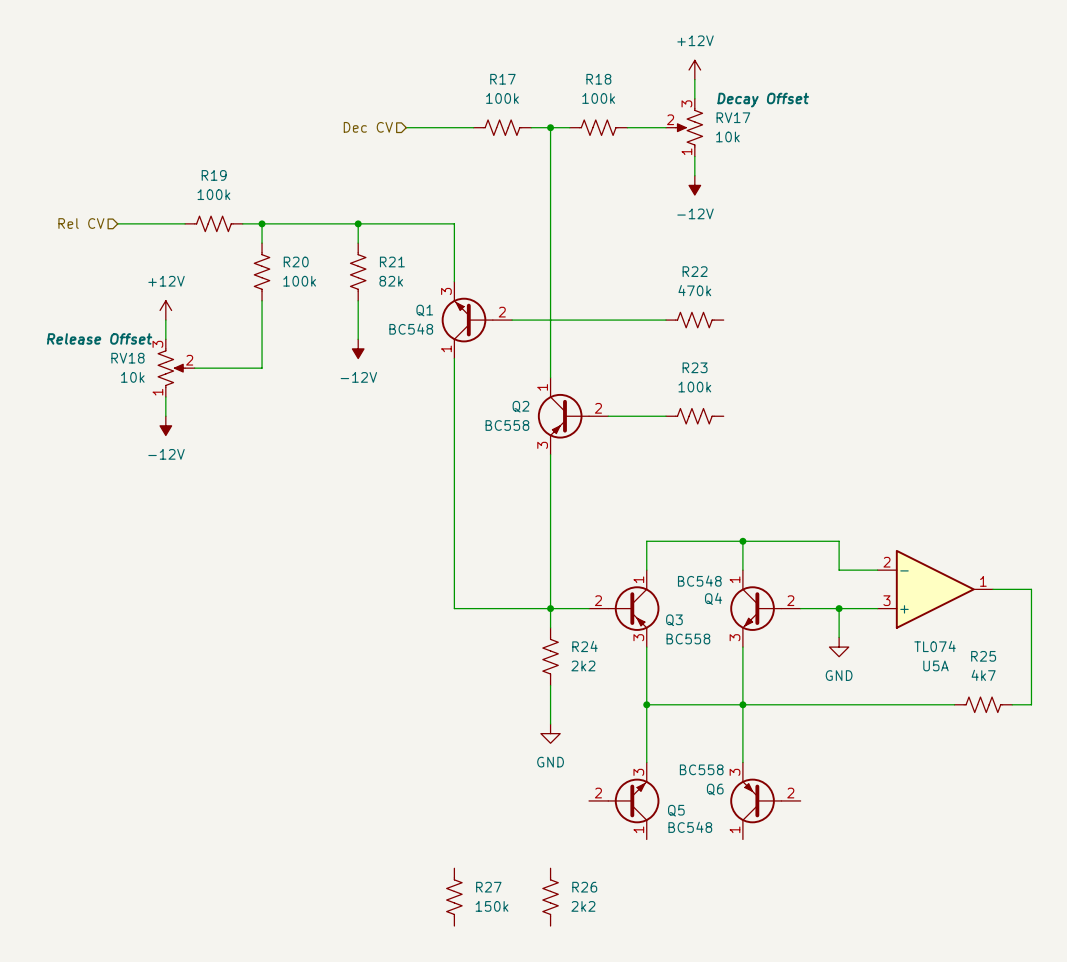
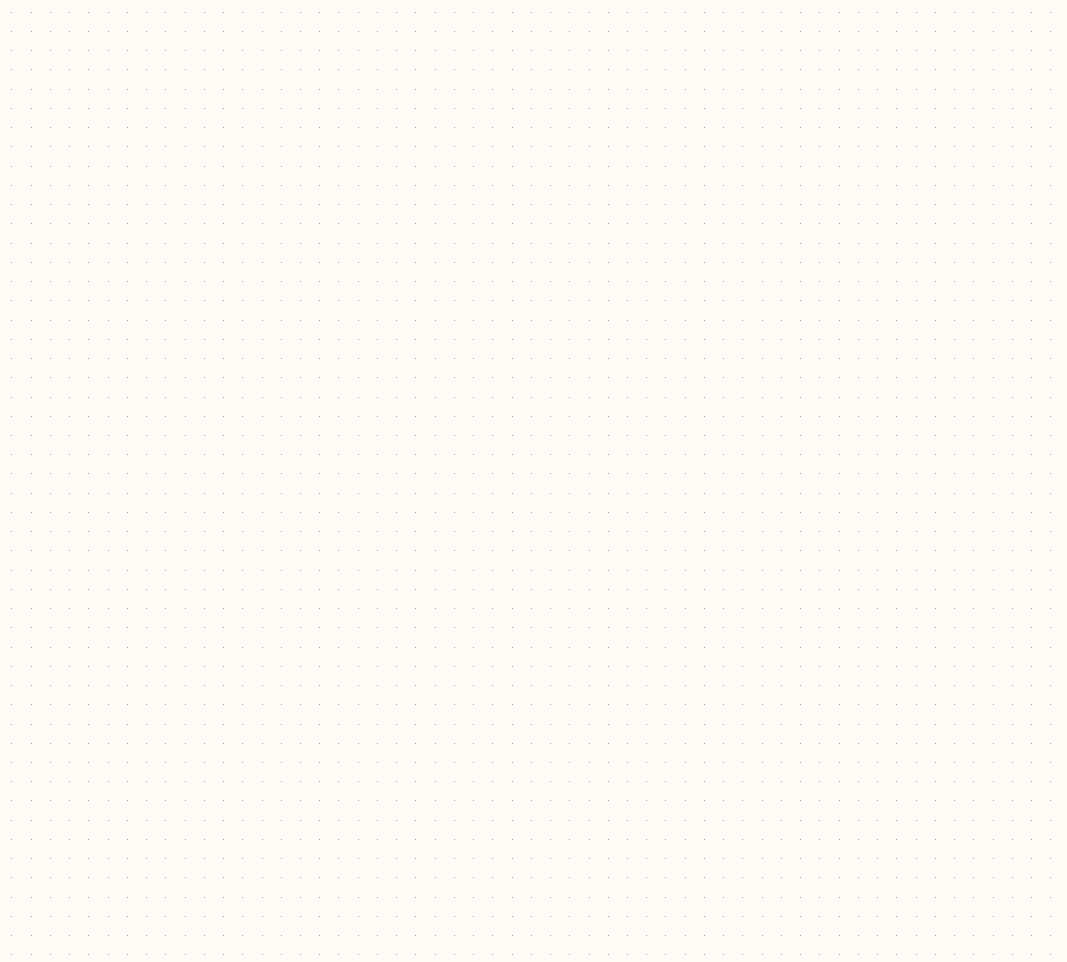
power symbol: +12V (694, 69) -> none
wire: (694, 79) (694, 98) -> none
hierarchical label: Dec CV (368, 127) -> none
wire: (406, 127) (473, 127) -> none
R17: 100k (502, 127) -> none
wire: (531, 127) (569, 127) -> none
wire: (550, 127) (550, 377) -> none
junction: (550, 127) -> none
R18: 100k (598, 127) -> none
wire: (627, 127) (665, 127) -> none
RV17: 10k (684, 127) -> none
wire: (694, 156) (694, 175) -> none
power symbol: -12V (694, 185) -> none
hierarchical label: Rel CV (81, 223) -> none
wire: (117, 223) (185, 223) -> none
R19: 100k (213, 223) -> none
wire: (242, 223) (454, 223) (454, 281) -> none
wire: (262, 223) (262, 243) -> none
junction: (262, 223) -> none
wire: (358, 223) (358, 243) -> none
junction: (358, 223) -> none
R20: 100k (262, 271) -> none
R21: 82k (358, 271) -> none
wire: (262, 300) (262, 368) (194, 368) -> none
wire: (358, 300) (358, 339) -> none
power symbol: +12V (165, 310) -> none
wire: (165, 320) (165, 339) -> none
Q1: BC548 (476, 320) -> none
wire: (512, 320) (665, 320) -> none
R22: 470k (694, 320) -> none
power symbol: -12V (358, 348) -> none
wire: (454, 358) (454, 608) (589, 608) -> none
RV18: 10k (176, 368) -> none
wire: (165, 397) (165, 416) -> none
Q2: BC558 (573, 416) -> none
wire: (608, 416) (665, 416) -> none
R23: 100k (694, 416) -> none
power symbol: -12V (165, 425) -> none
wire: (550, 454) (550, 627) -> none
wire: (742, 541) (742, 570) -> none
junction: (742, 541) -> none
wire: (646, 570) (646, 541) (839, 541) (839, 570) (877, 570) -> none
U5A: TL074 (935, 589) -> none
wire: (993, 589) (1031, 589) (1031, 704) (1012, 704) -> none
junction: (550, 608) -> none
Q3: BC558 (624, 608) -> none
Q4: BC548 (765, 608) -> none
wire: (800, 608) (877, 608) -> none
wire: (839, 608) (839, 637) -> none
junction: (839, 608) -> none
wire: (646, 647) (646, 762) -> none
wire: (742, 647) (742, 762) -> none
power symbol: GND (839, 647) -> none
R24: 2k2 (550, 656) -> none
wire: (550, 685) (550, 724) -> none
wire: (646, 704) (954, 704) -> none
junction: (646, 704) -> none
junction: (742, 704) -> none
R25: 4k7 (983, 704) -> none
power symbol: GND (550, 733) -> none
Q5: BC548 (624, 800) -> none
Q6: BC558 (765, 800) -> none
R27: 150k (454, 897) -> none
R26: 2k2 (550, 897) -> none

